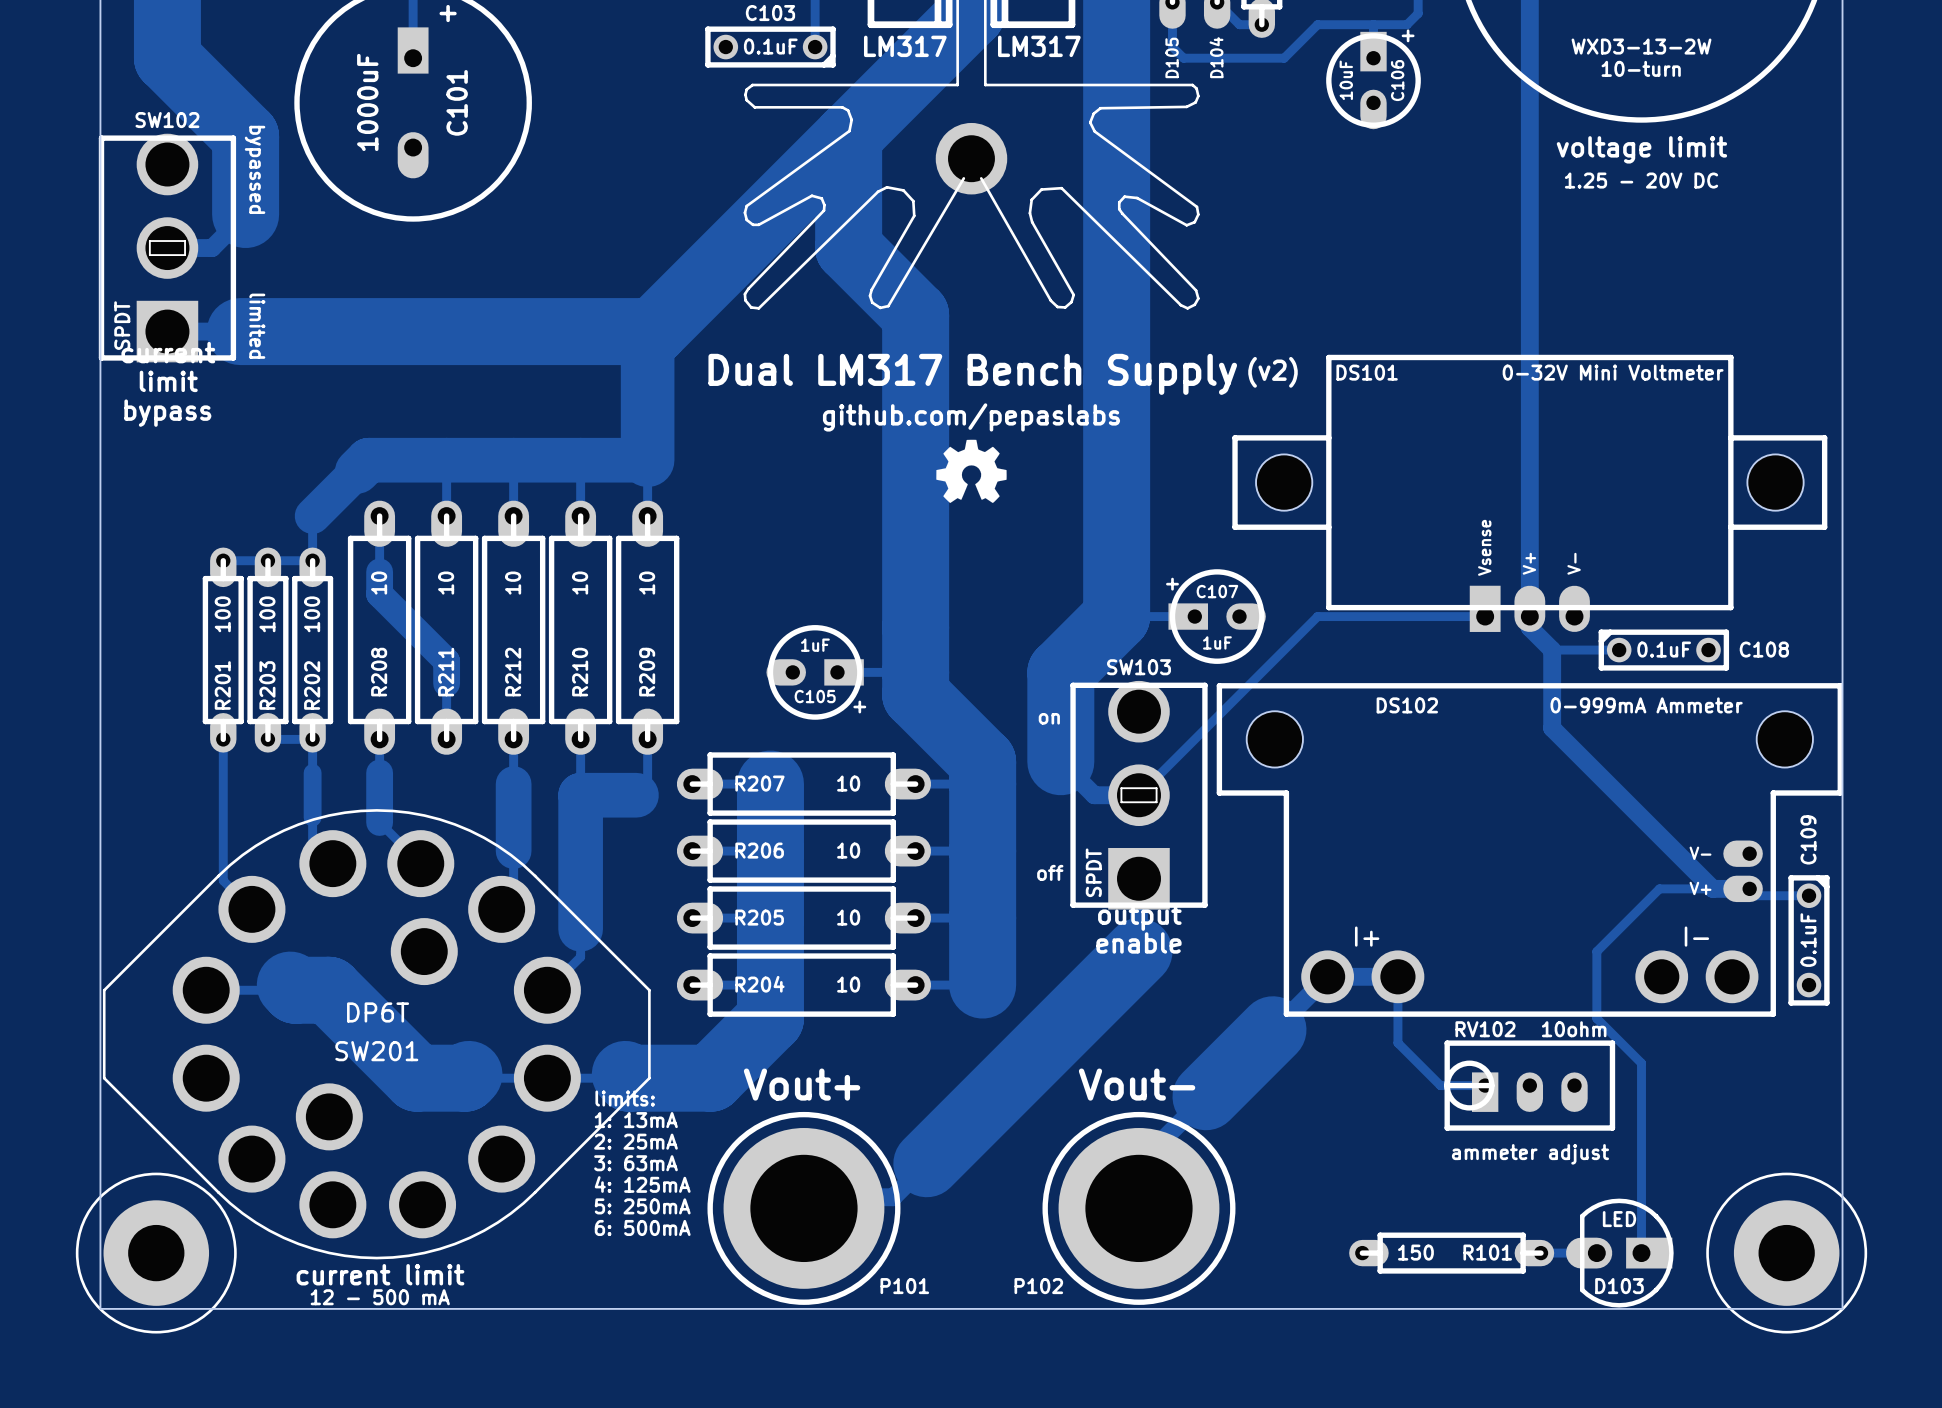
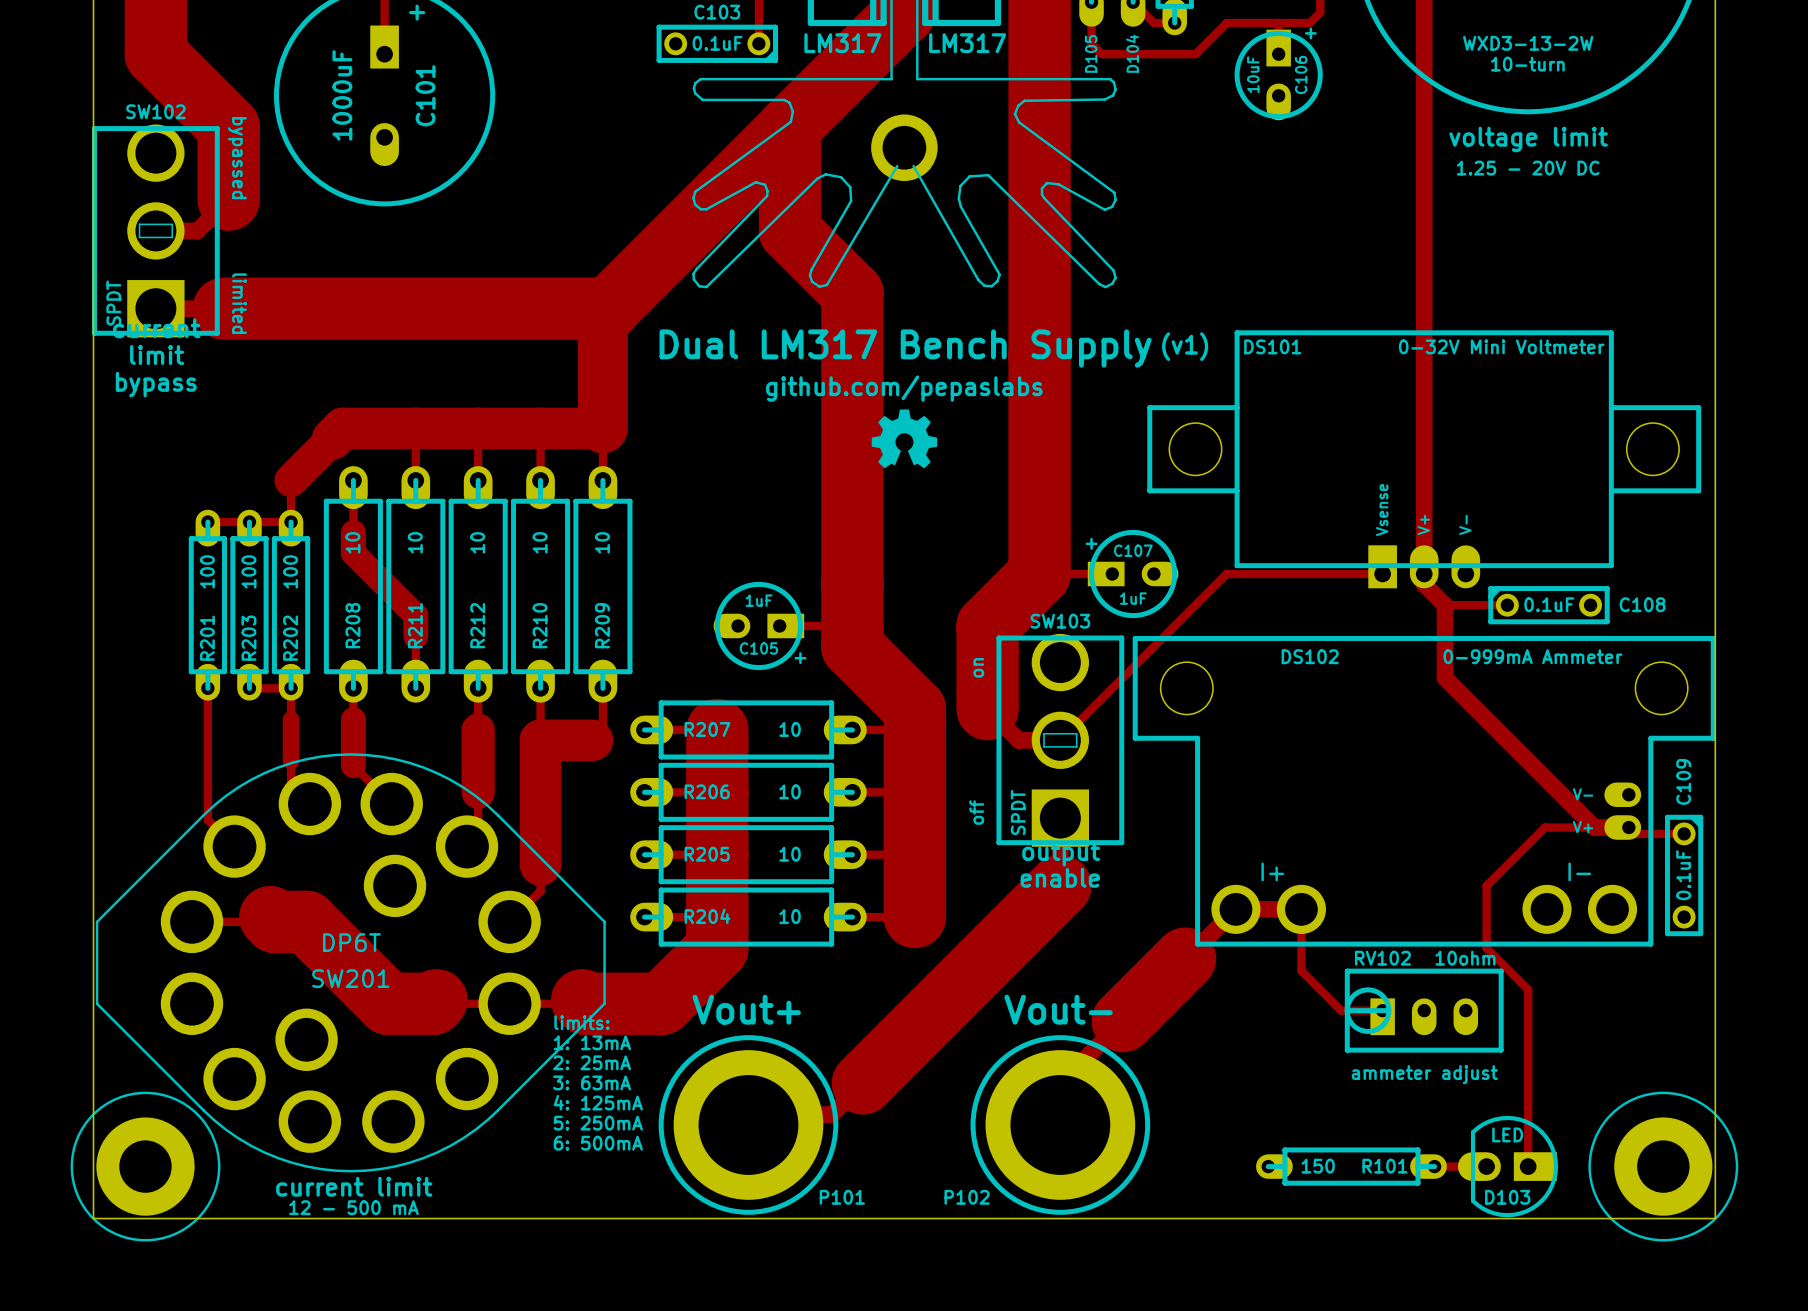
text: (v2) (1272, 372) -> (v1) (1185, 346)
text rotation: 0° (1049, 718) -> 90° counterclockwise (978, 667)
text rotation: 0° (1050, 872) -> 90° counterclockwise (976, 812)

